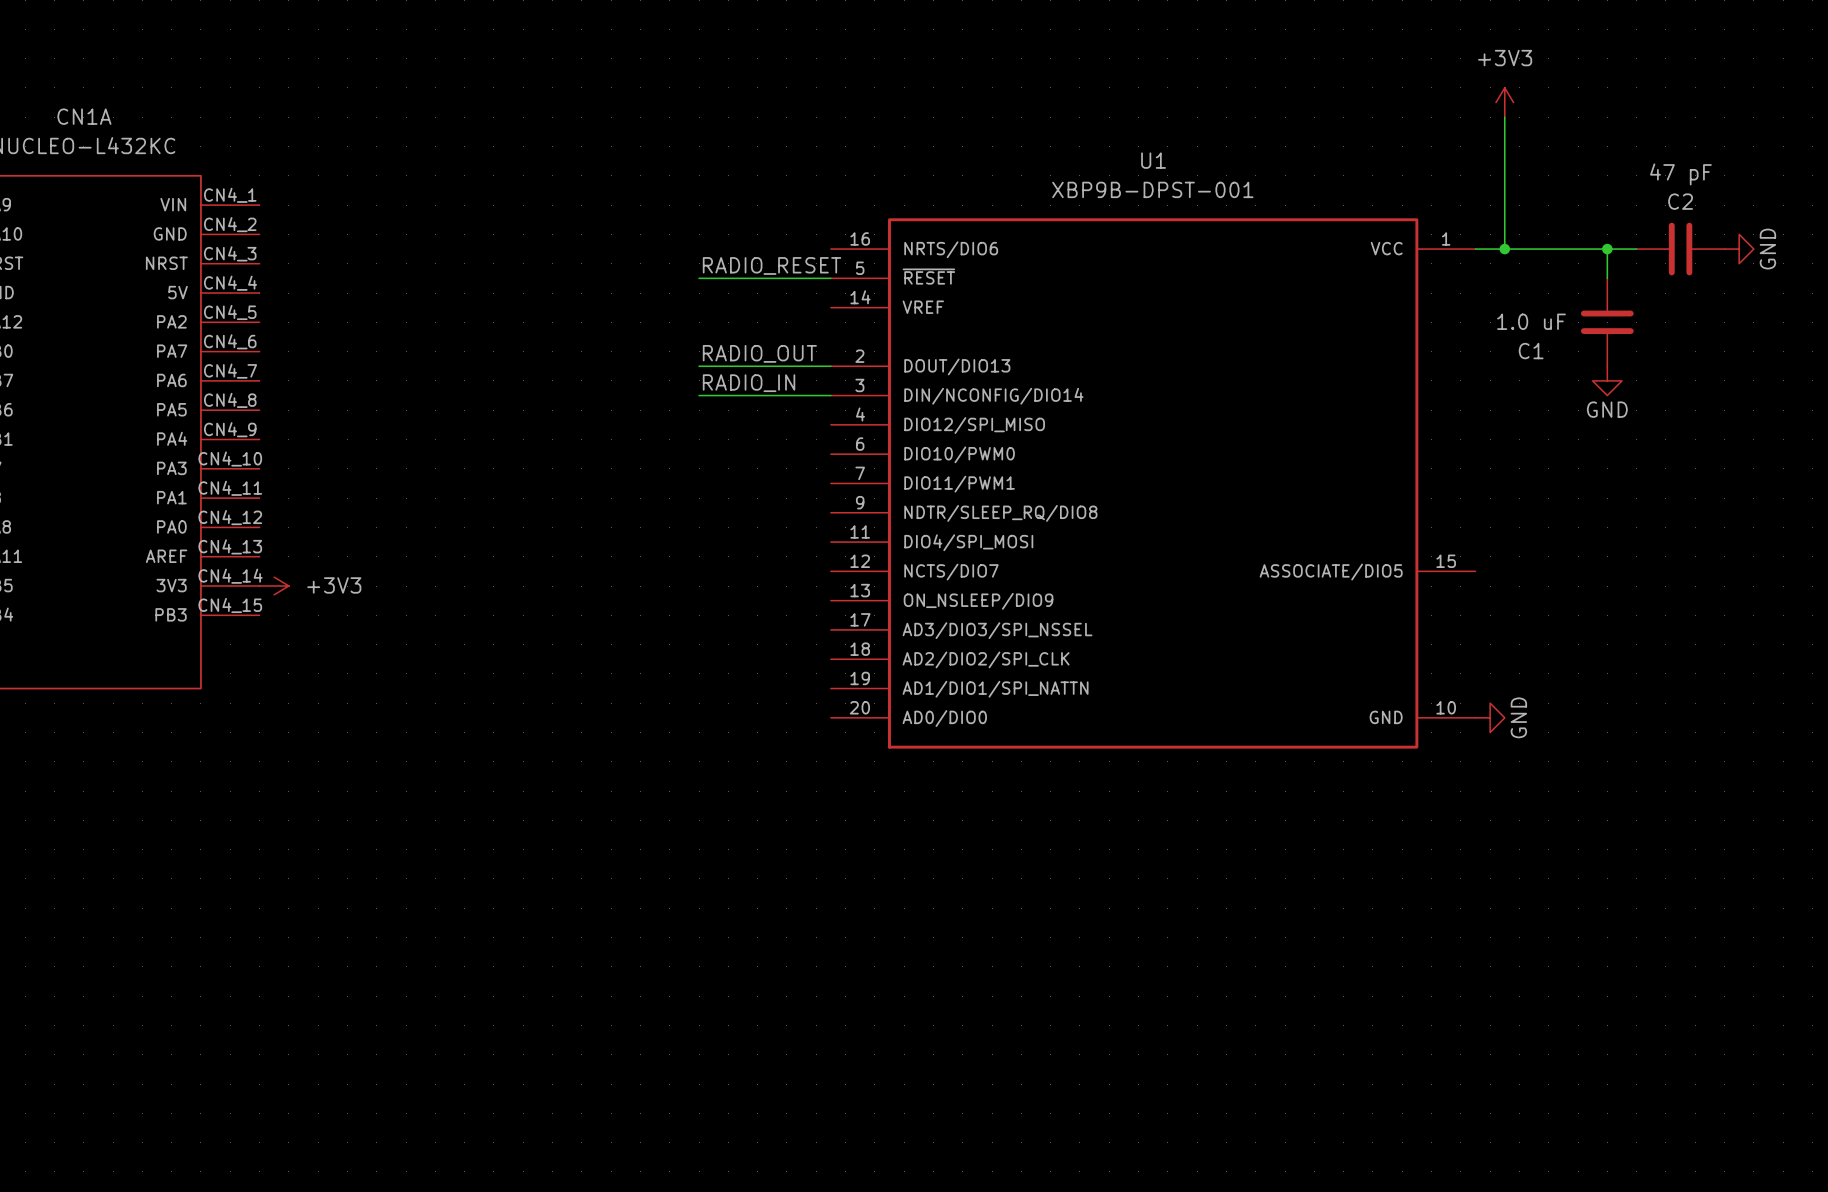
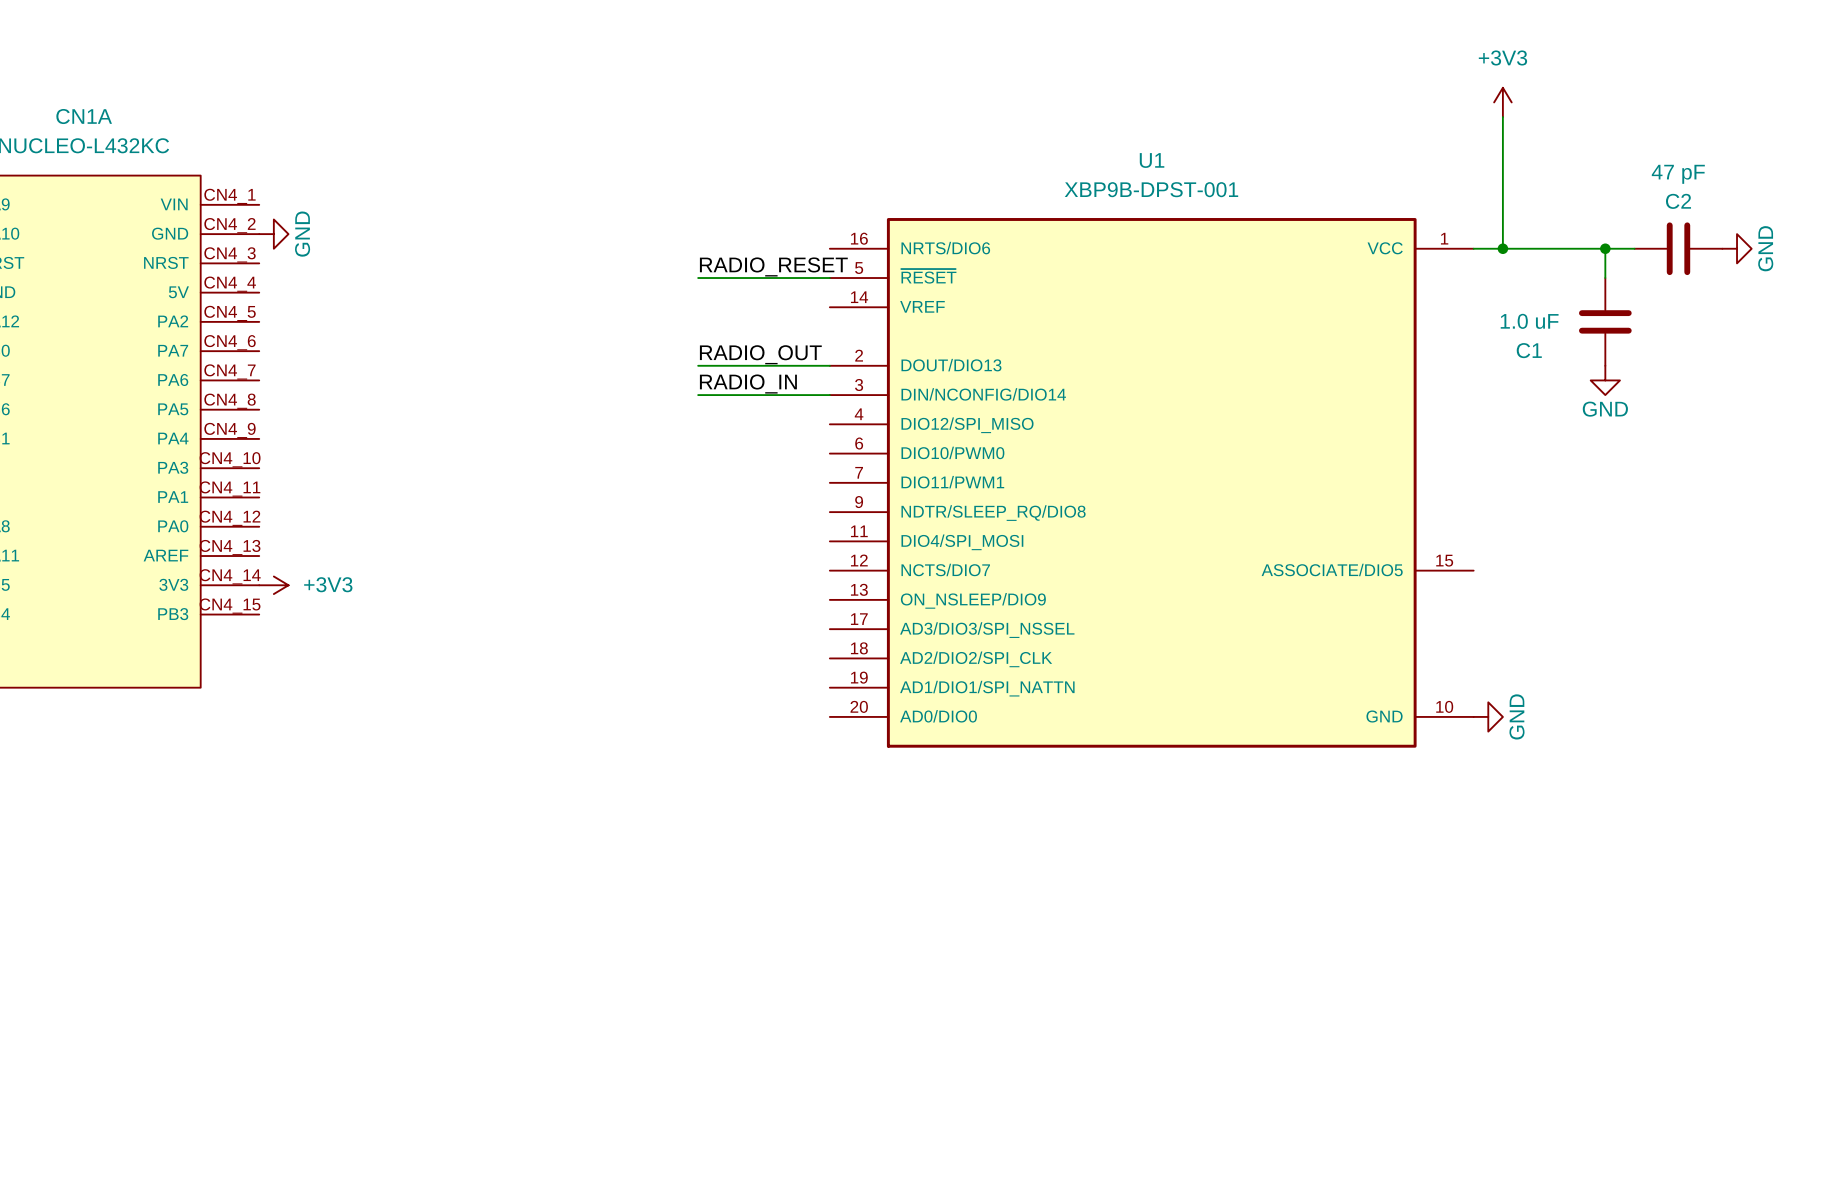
power symbol: none -> GND (273, 234)

